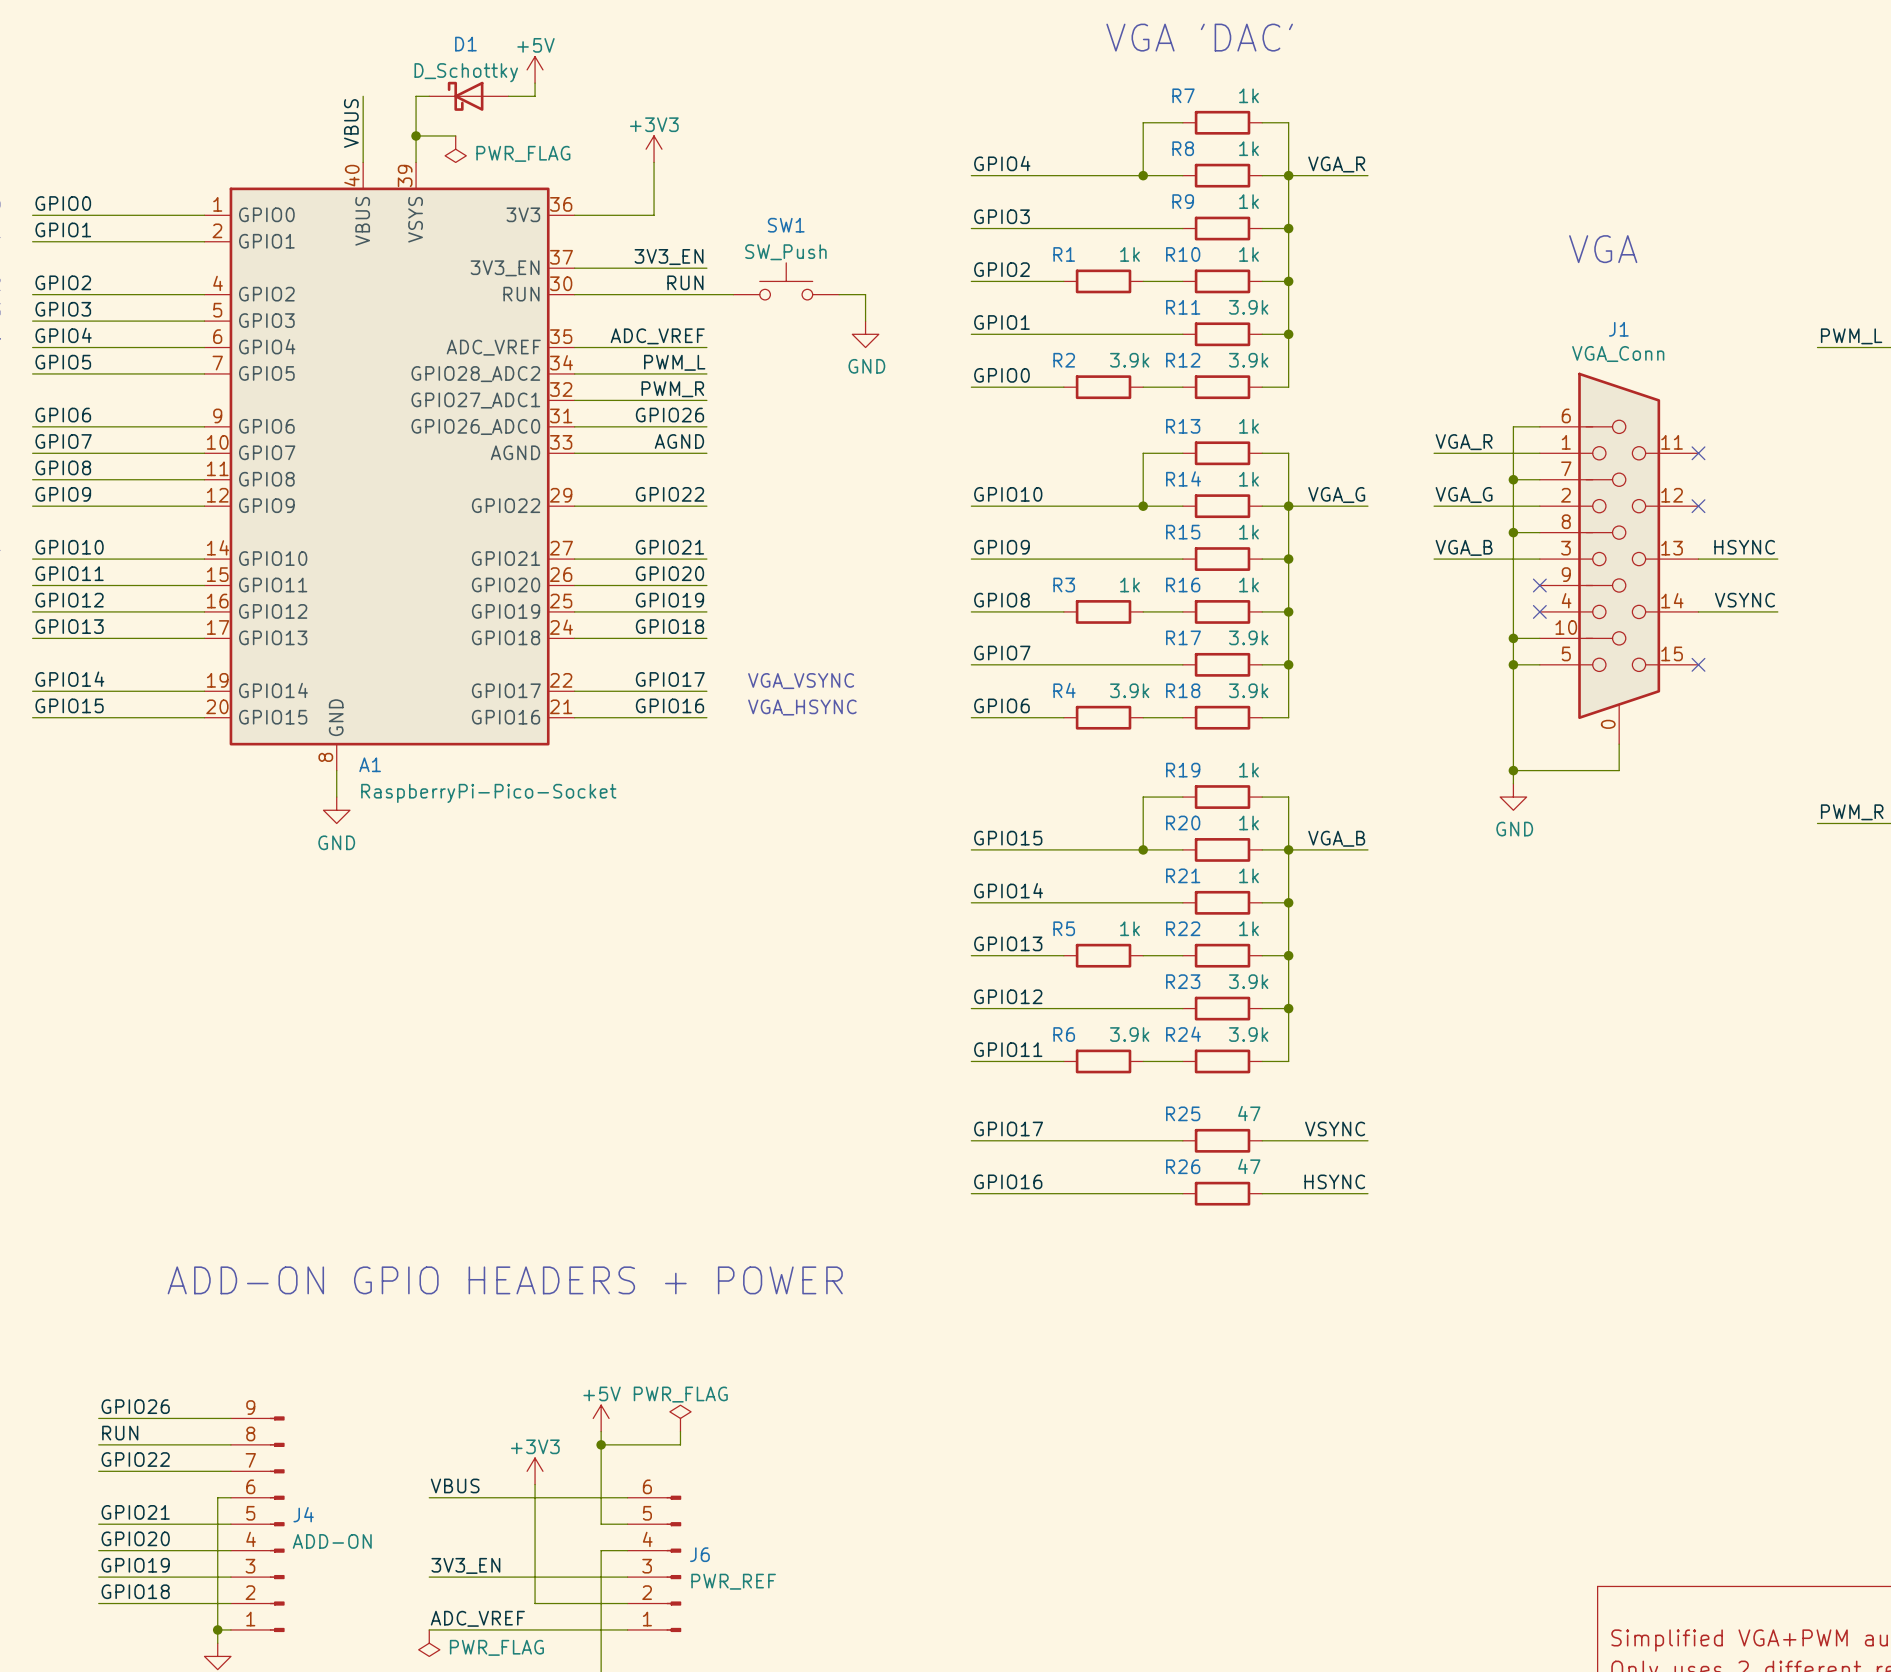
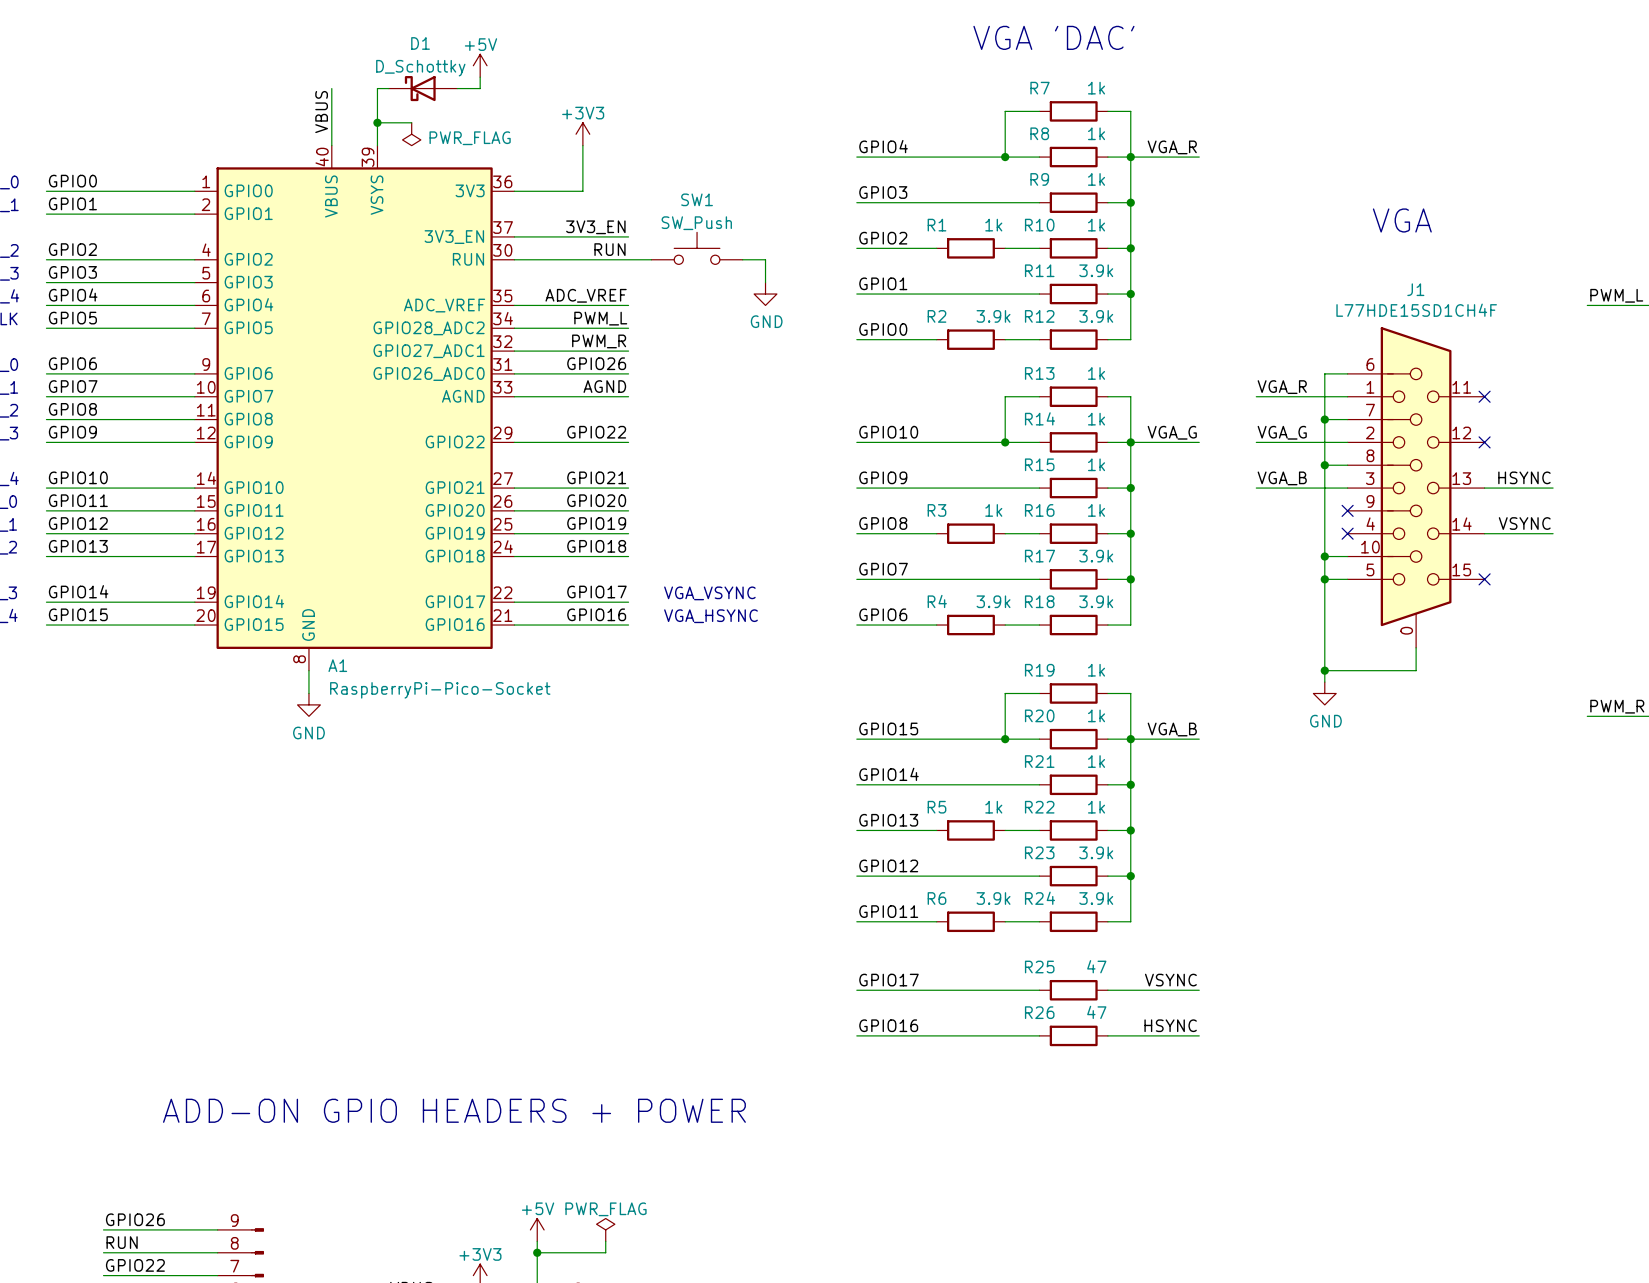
J1 value: VGA_Conn (1618, 354) -> L77HDE15SD1CH4F (1416, 310)

